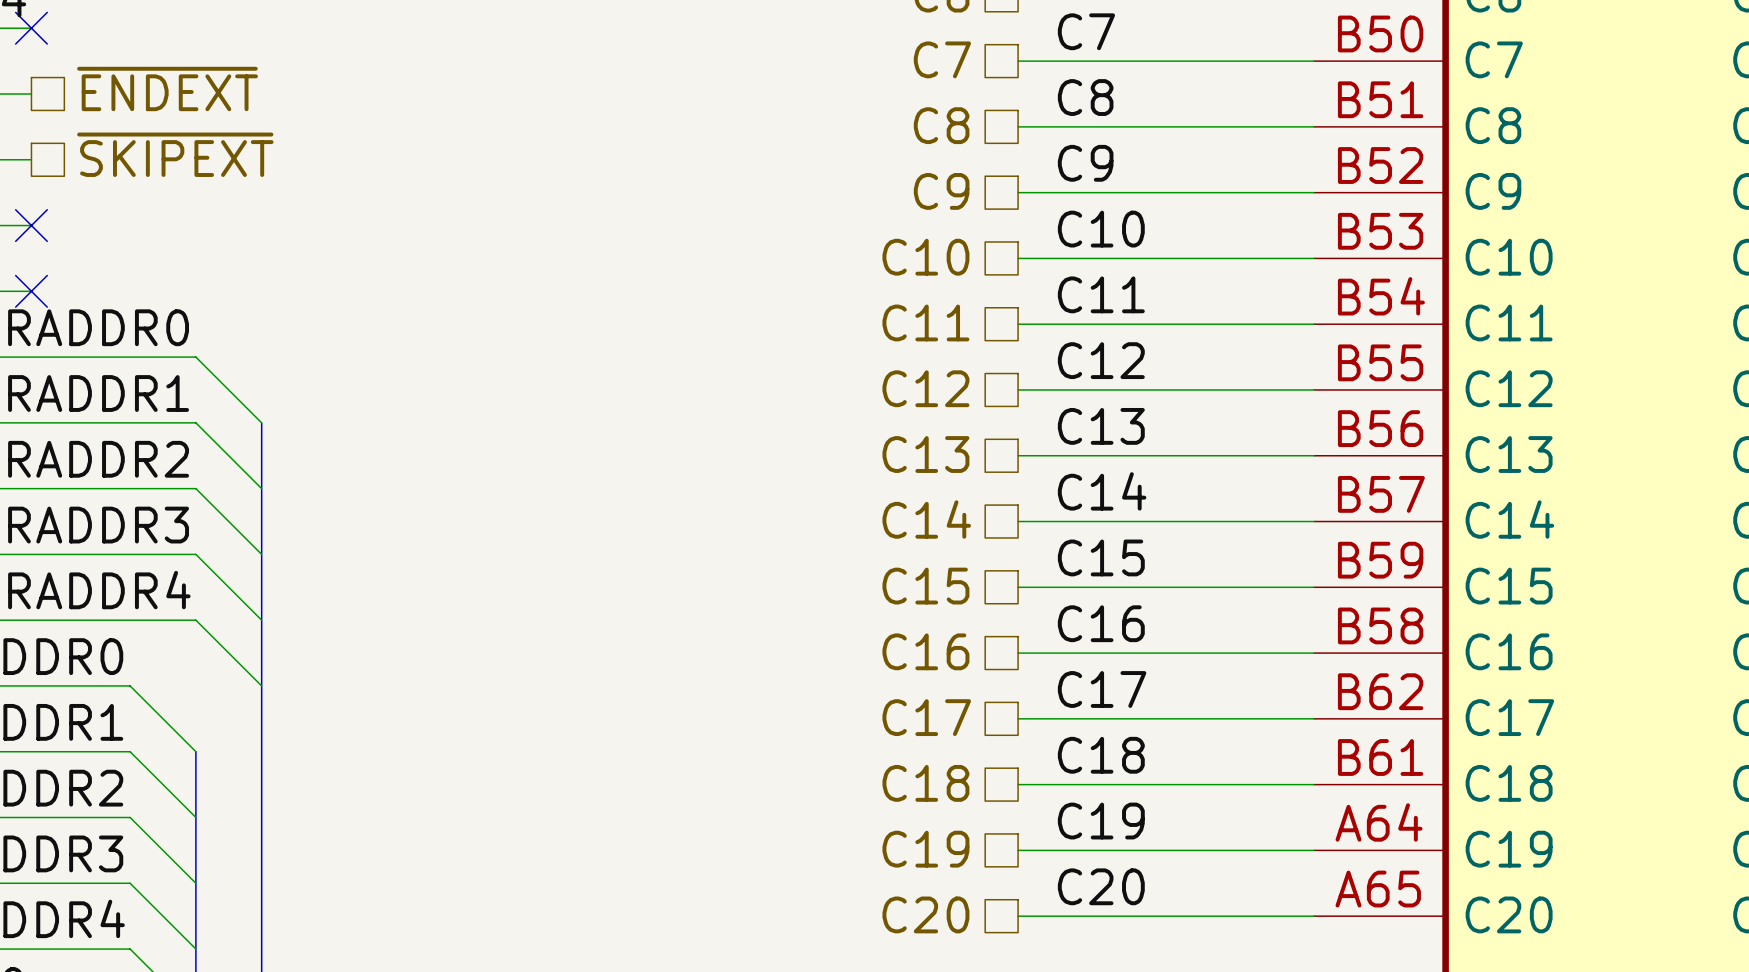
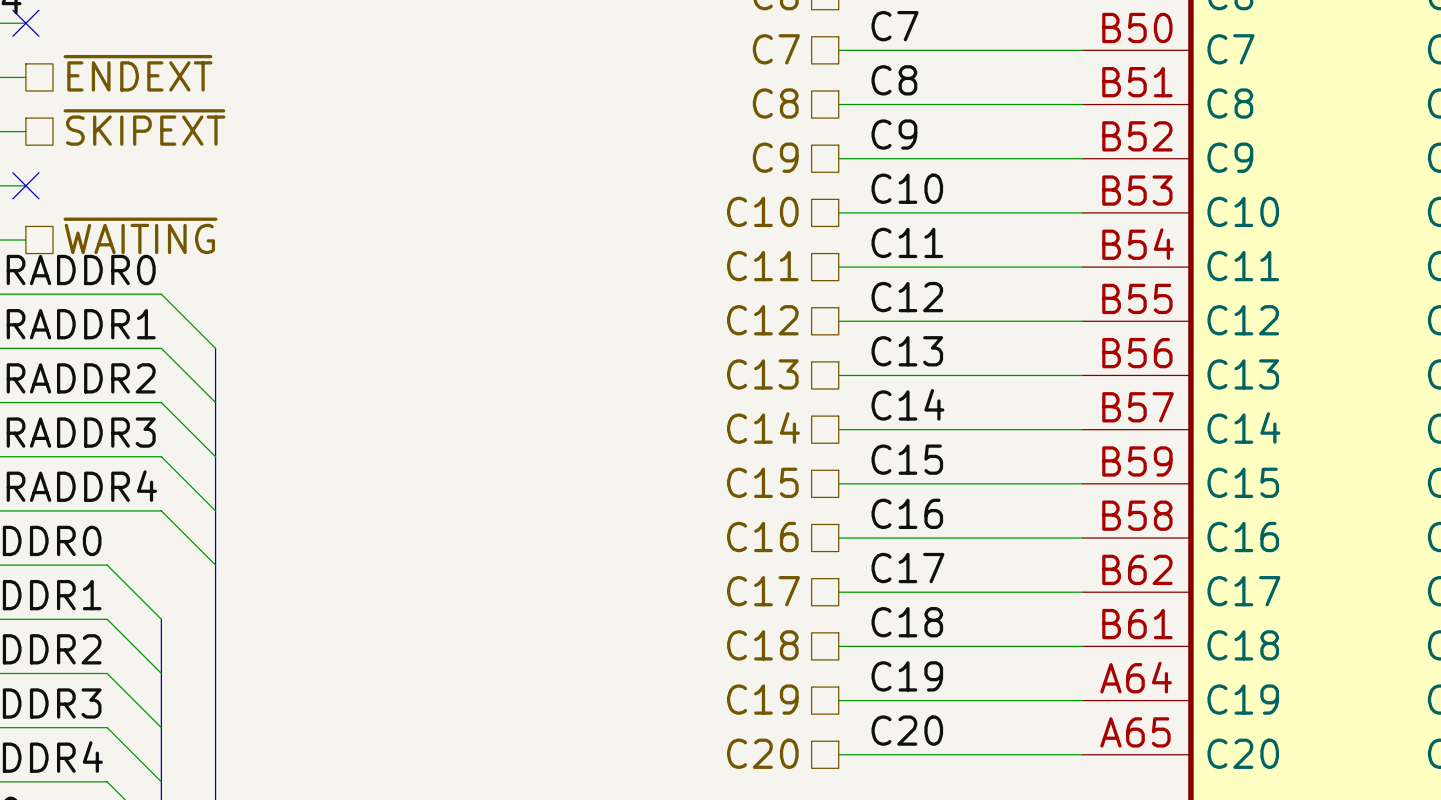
hierarchical label: none -> ~{WAITING} (140, 235)
no-connect mark: (31, 291) -> none

